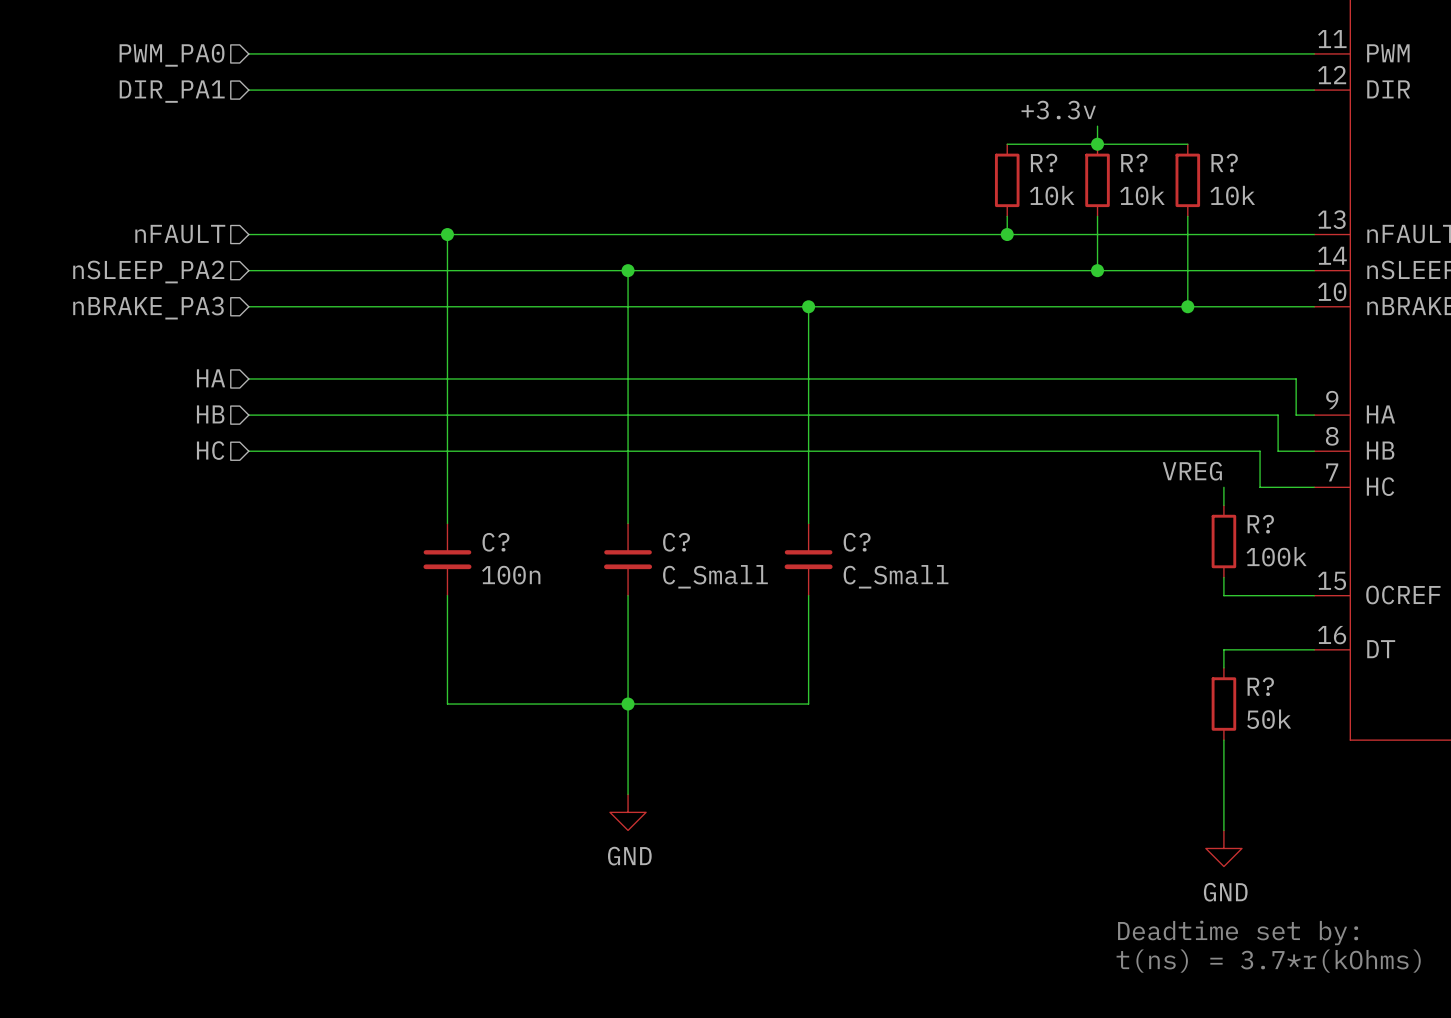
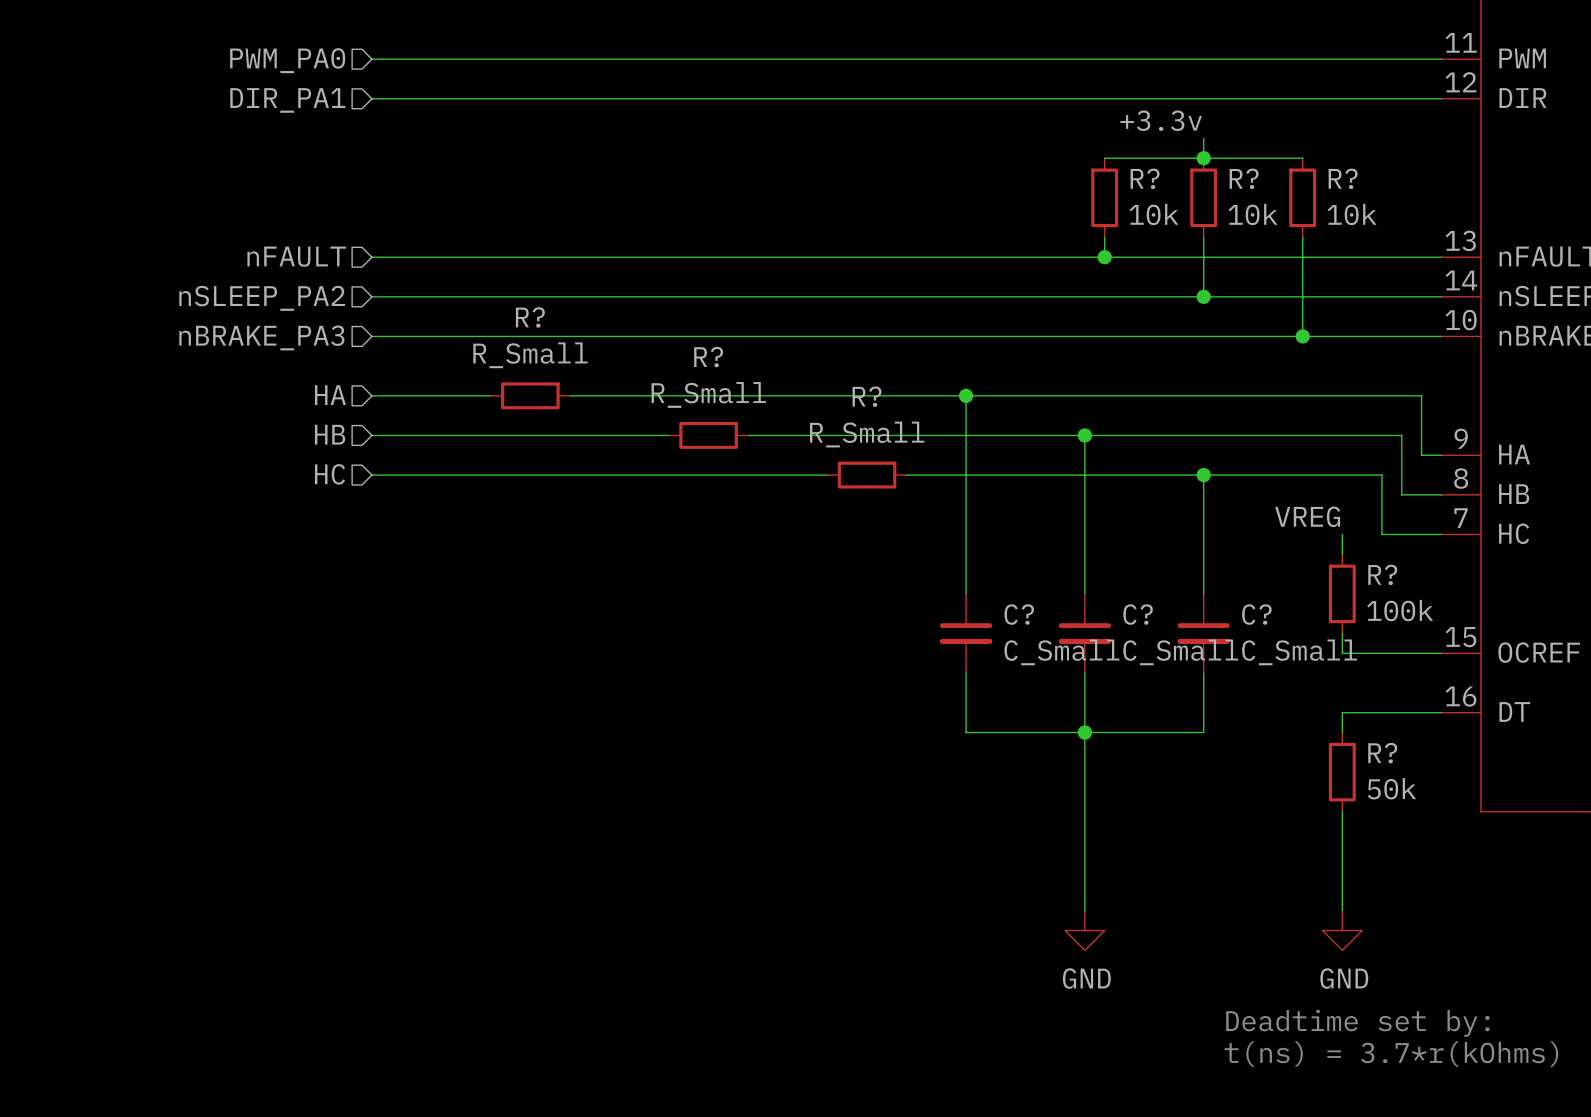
wire: (248, 53) (339, 53) -> none
hierarchical label position: PWM_PA0 (172, 55) -> PWM_PA0 (287, 60)
wire: (248, 90) (339, 90) -> none
hierarchical label position: DIR_PA1 (172, 91) -> DIR_PA1 (287, 100)
hierarchical label position: nFAULT (180, 234) -> nFAULT (296, 256)
wire: (248, 234) (339, 234) -> none
wire: (447, 234) (447, 523) -> none
junction: (447, 234) -> none
wire: (248, 270) (339, 270) -> none
wire: (628, 270) (628, 523) -> none
junction: (628, 270) -> none
hierarchical label position: nSLEEP_PA2 (148, 272) -> nSLEEP_PA2 (262, 298)
wire: (248, 306) (339, 306) -> none
wire: (808, 306) (808, 523) -> none
junction: (808, 306) -> none
hierarchical label position: nBRAKE_PA3 (148, 308) -> nBRAKE_PA3 (261, 337)
wire: none -> (371, 395) (490, 395)
R?: none -> R_Small (530, 395)
wire: none -> (966, 395) (966, 593)
junction: none -> (966, 395)
hierarchical label position: HA (211, 378) -> HA (330, 395)
wire: (248, 378) (1296, 378) -> (569, 395) (1421, 395) (1421, 415)
wire: none -> (371, 435) (668, 435)
R?: none -> R_Small (708, 435)
wire: none -> (1084, 435) (1084, 593)
junction: none -> (1084, 435)
hierarchical label position: HB (210, 414) -> HB (330, 434)
wire: (248, 415) (1278, 415) -> (748, 435) (1401, 435) (1401, 455)
wire: none -> (371, 475) (827, 475)
R?: none -> R_Small (867, 475)
wire: none -> (1203, 475) (1203, 593)
junction: none -> (1203, 475)
hierarchical label position: HC (210, 450) -> HC (330, 474)
wire: (248, 451) (1260, 451) -> (906, 475) (1381, 475) (1381, 494)
C?: 100n (447, 559) -> none
C?: C_Small (628, 559) -> none
C? position: (808, 559) -> (966, 633)
C?: none -> C_Small (1084, 633)
C?: none -> C_Small (1203, 633)
wire: (447, 595) (447, 704) (808, 704) (808, 595) -> none
wire: (628, 595) (628, 794) -> none
wire: none -> (966, 673) (966, 732) (1203, 732) (1203, 673)
wire: none -> (1084, 673) (1084, 910)
junction: none -> (1084, 732)
junction: (628, 704) -> none
power symbol: GND (628, 812) -> none
power symbol: none -> GND (1084, 930)

